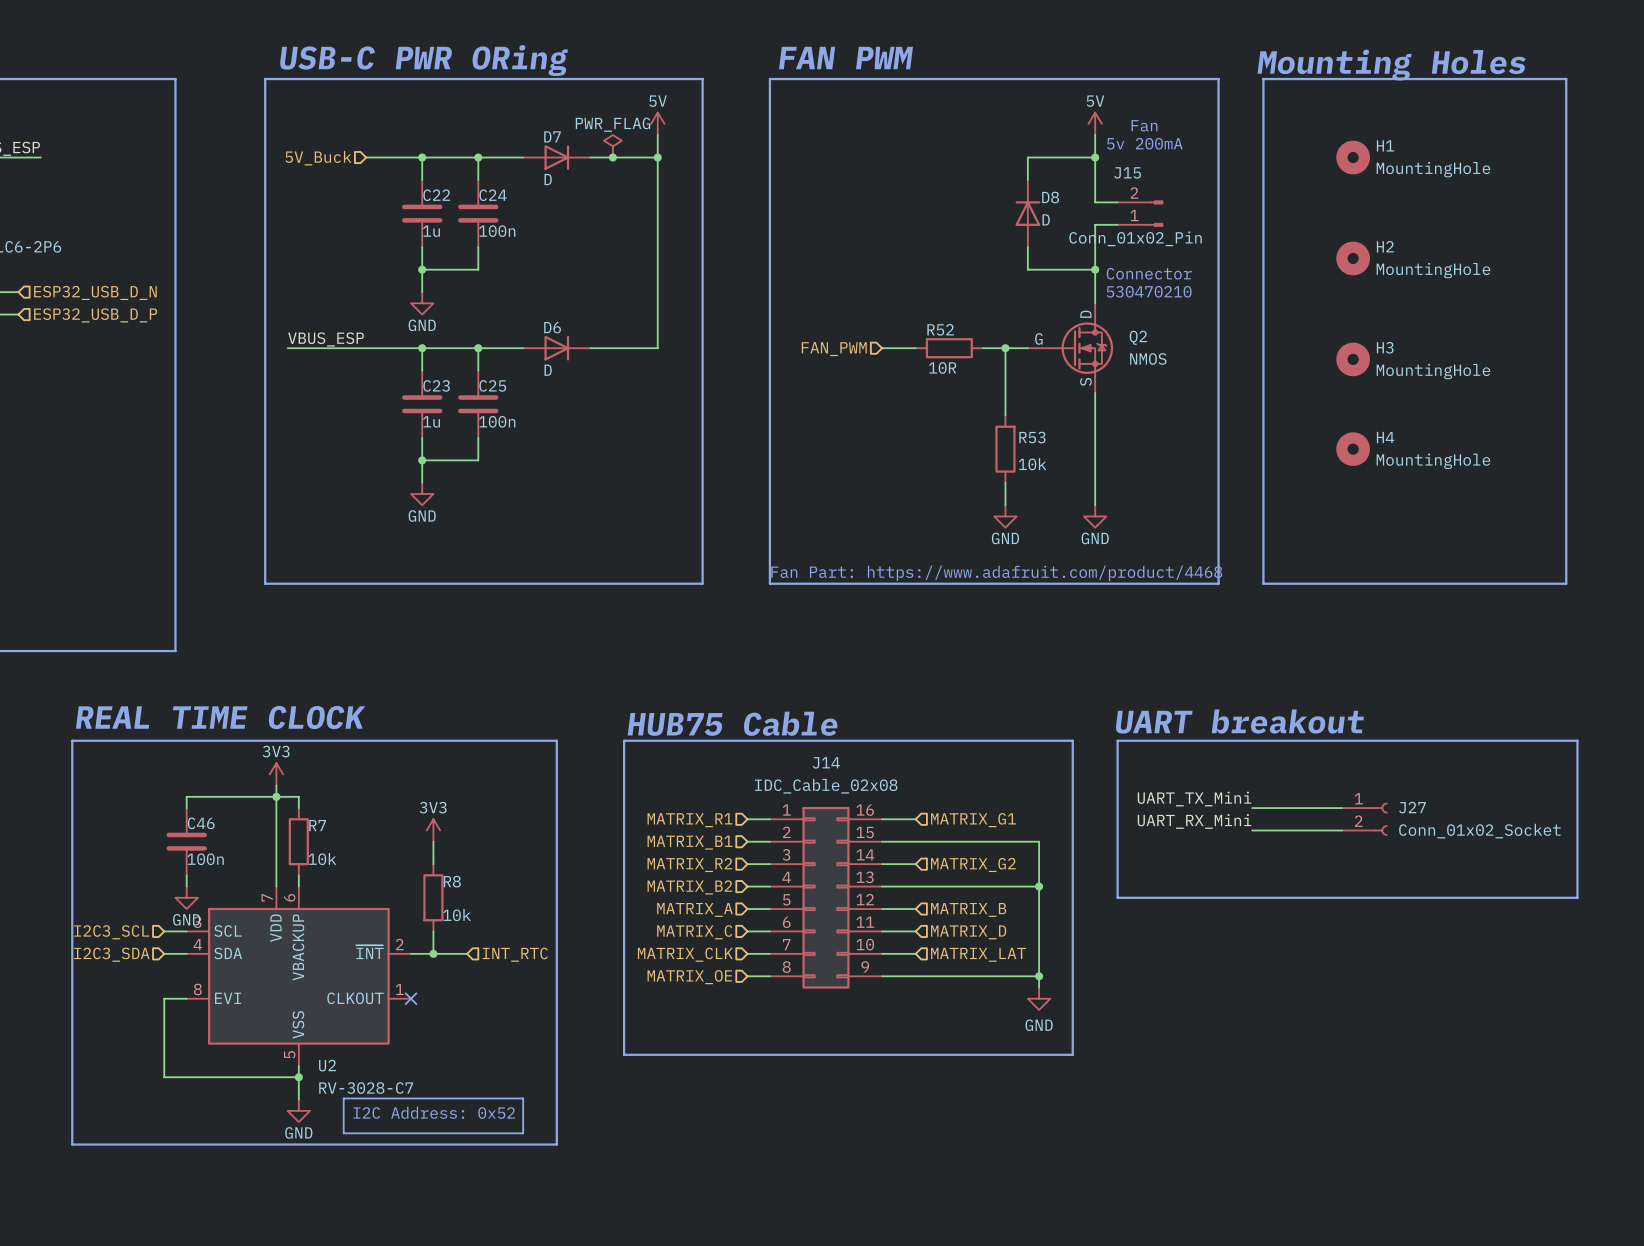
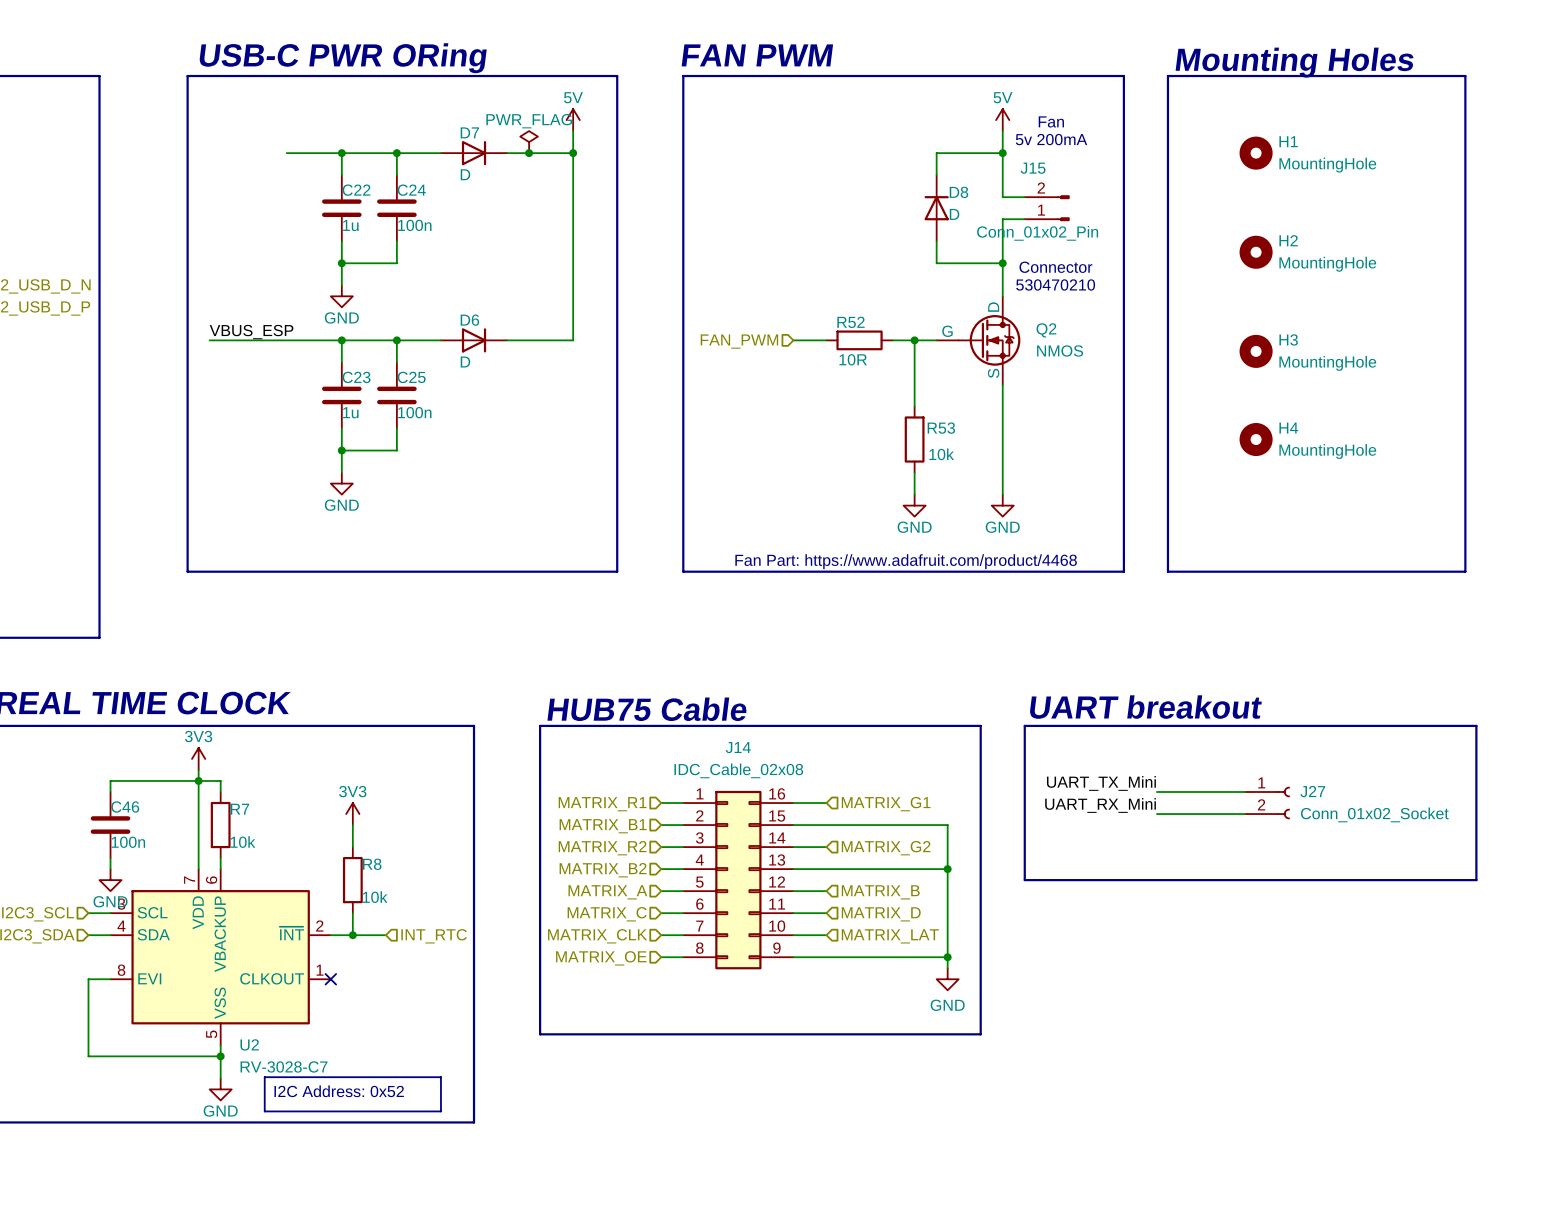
hierarchical label: 5V_Buck (318, 158) -> none

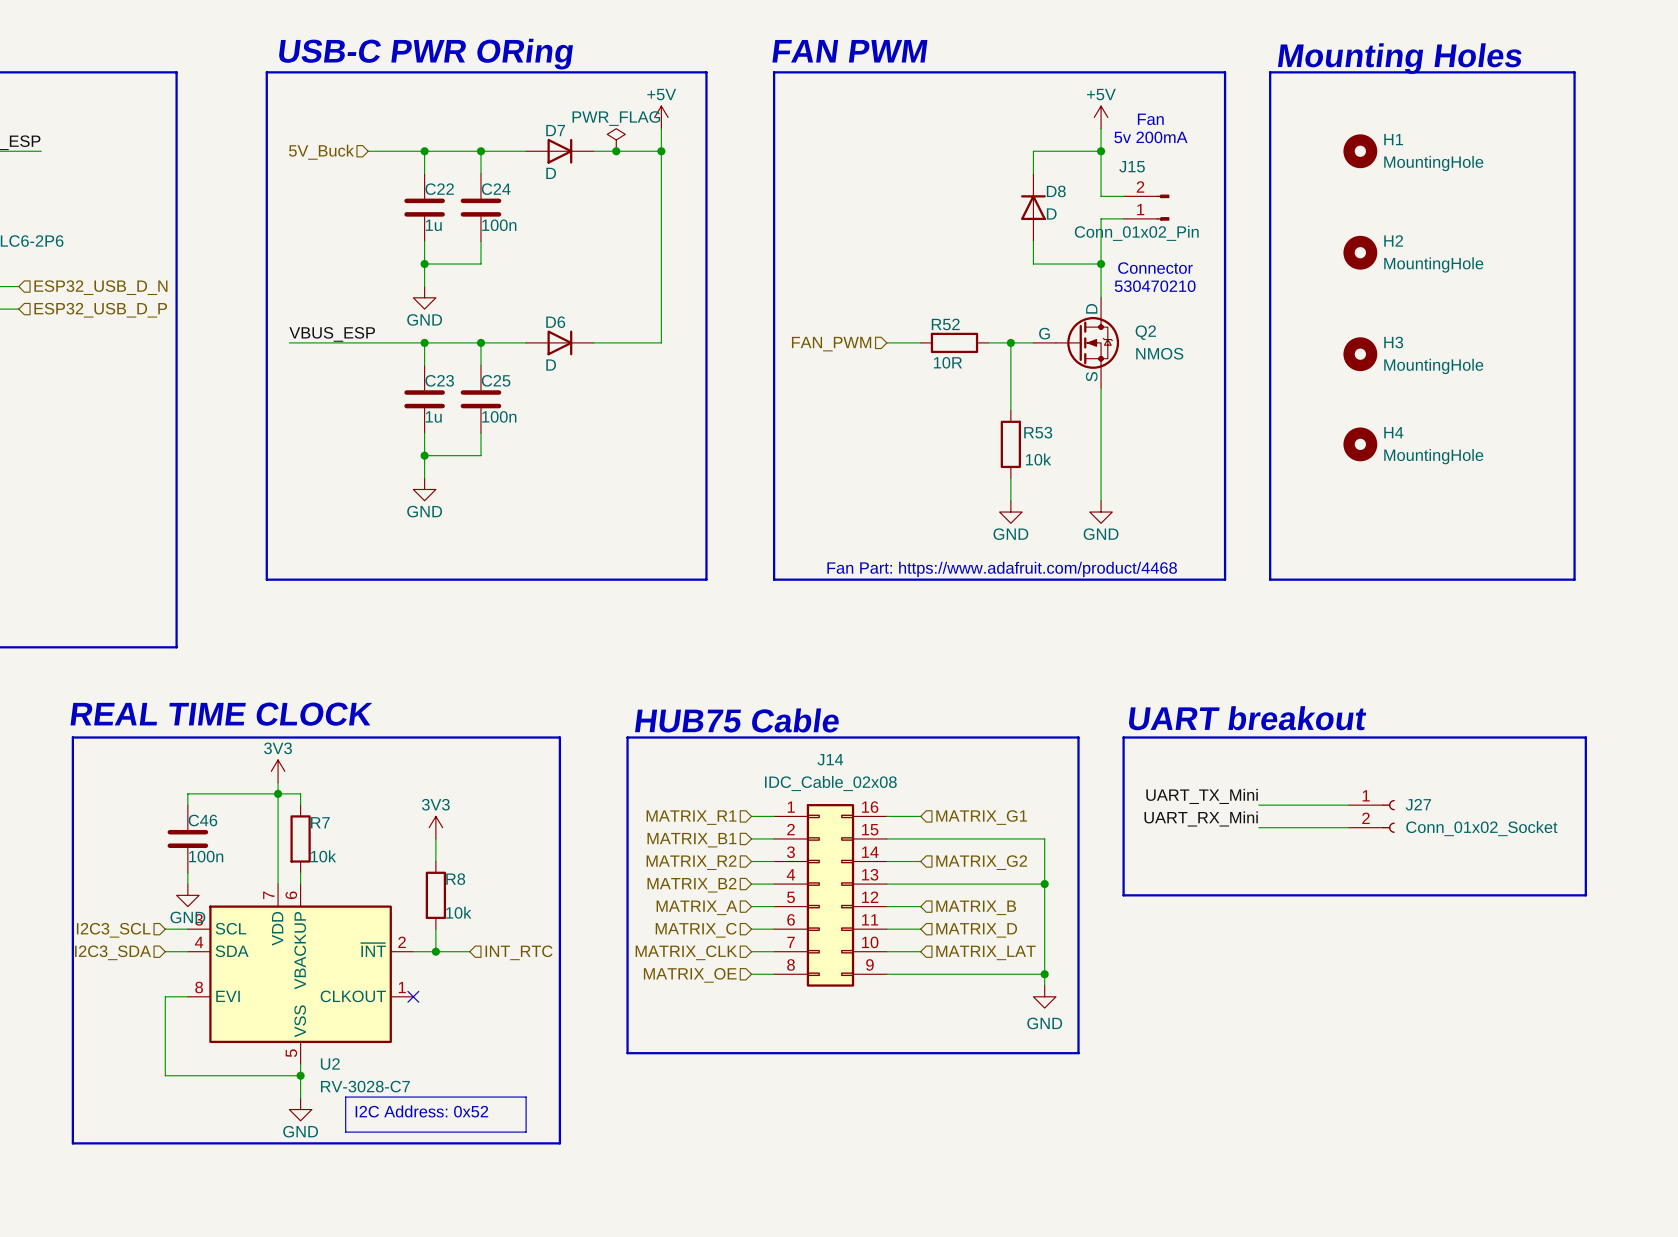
power symbol: 5V (573, 120) -> +5V (661, 117)
power symbol: 5V (1002, 120) -> +5V (1101, 117)
hierarchical label: none -> 5V_Buck (321, 152)

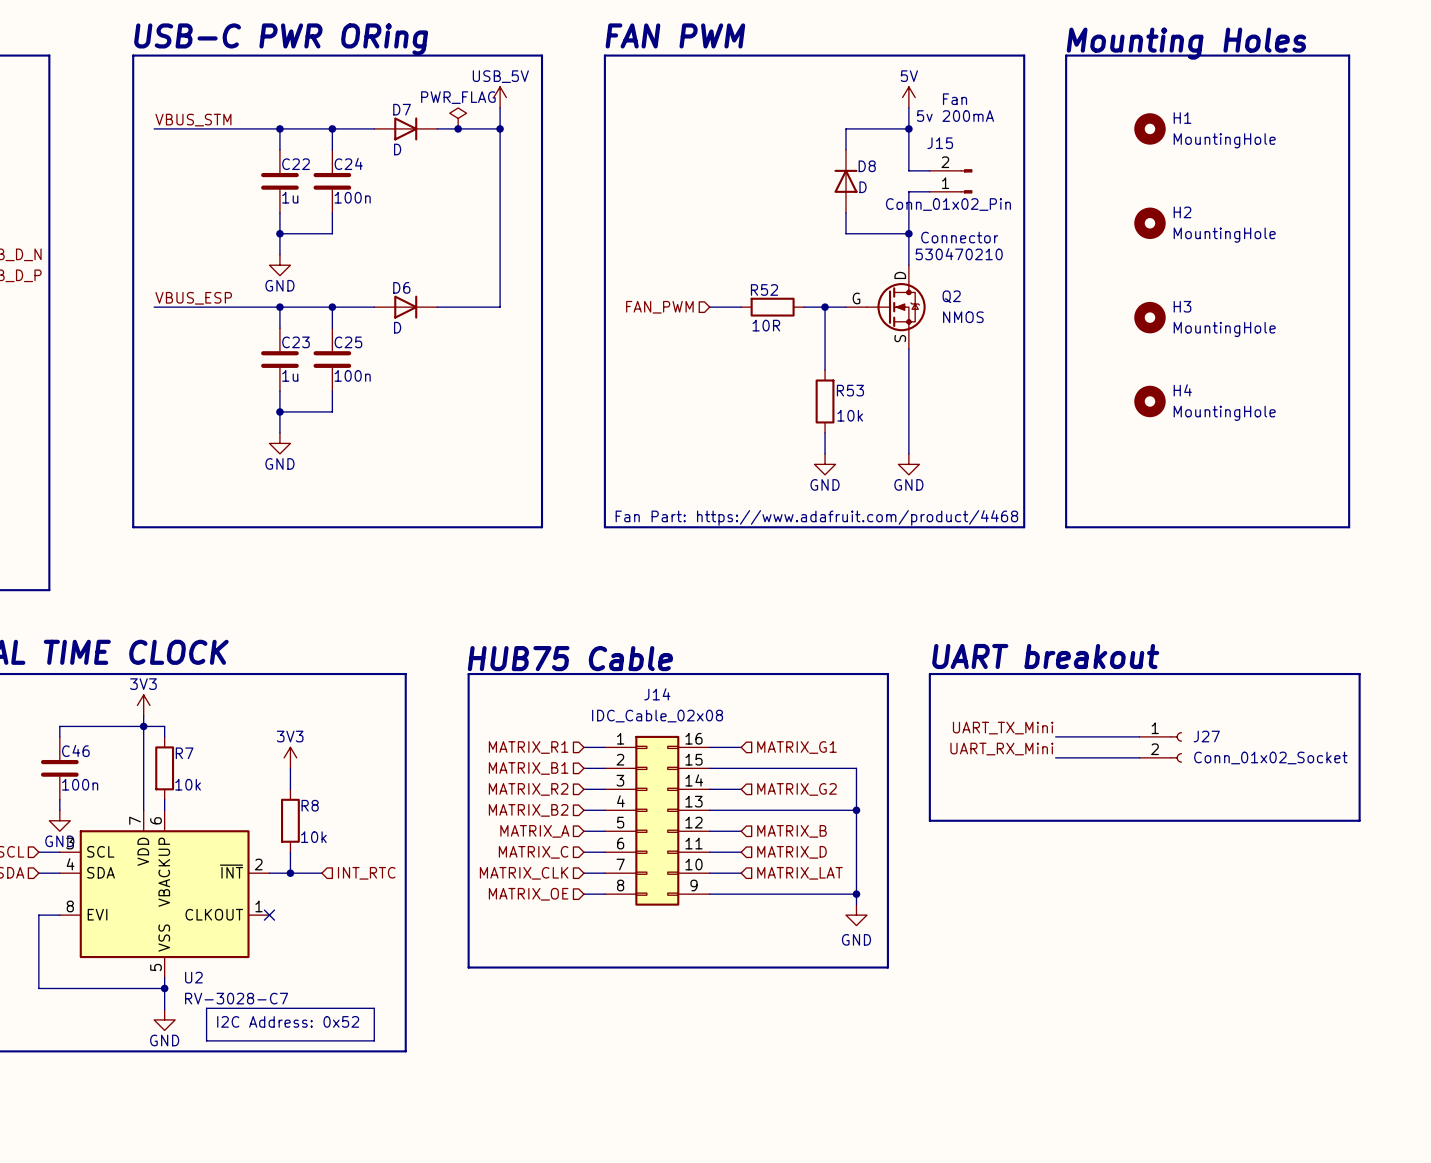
power symbol: +5V (661, 117) -> USB_5V (500, 97)
power symbol: +5V (1101, 117) -> 5V (908, 97)
label: none -> VBUS_STM (193, 120)
wire: none -> (154, 128) (227, 128)
hierarchical label: 5V_Buck (321, 152) -> none

